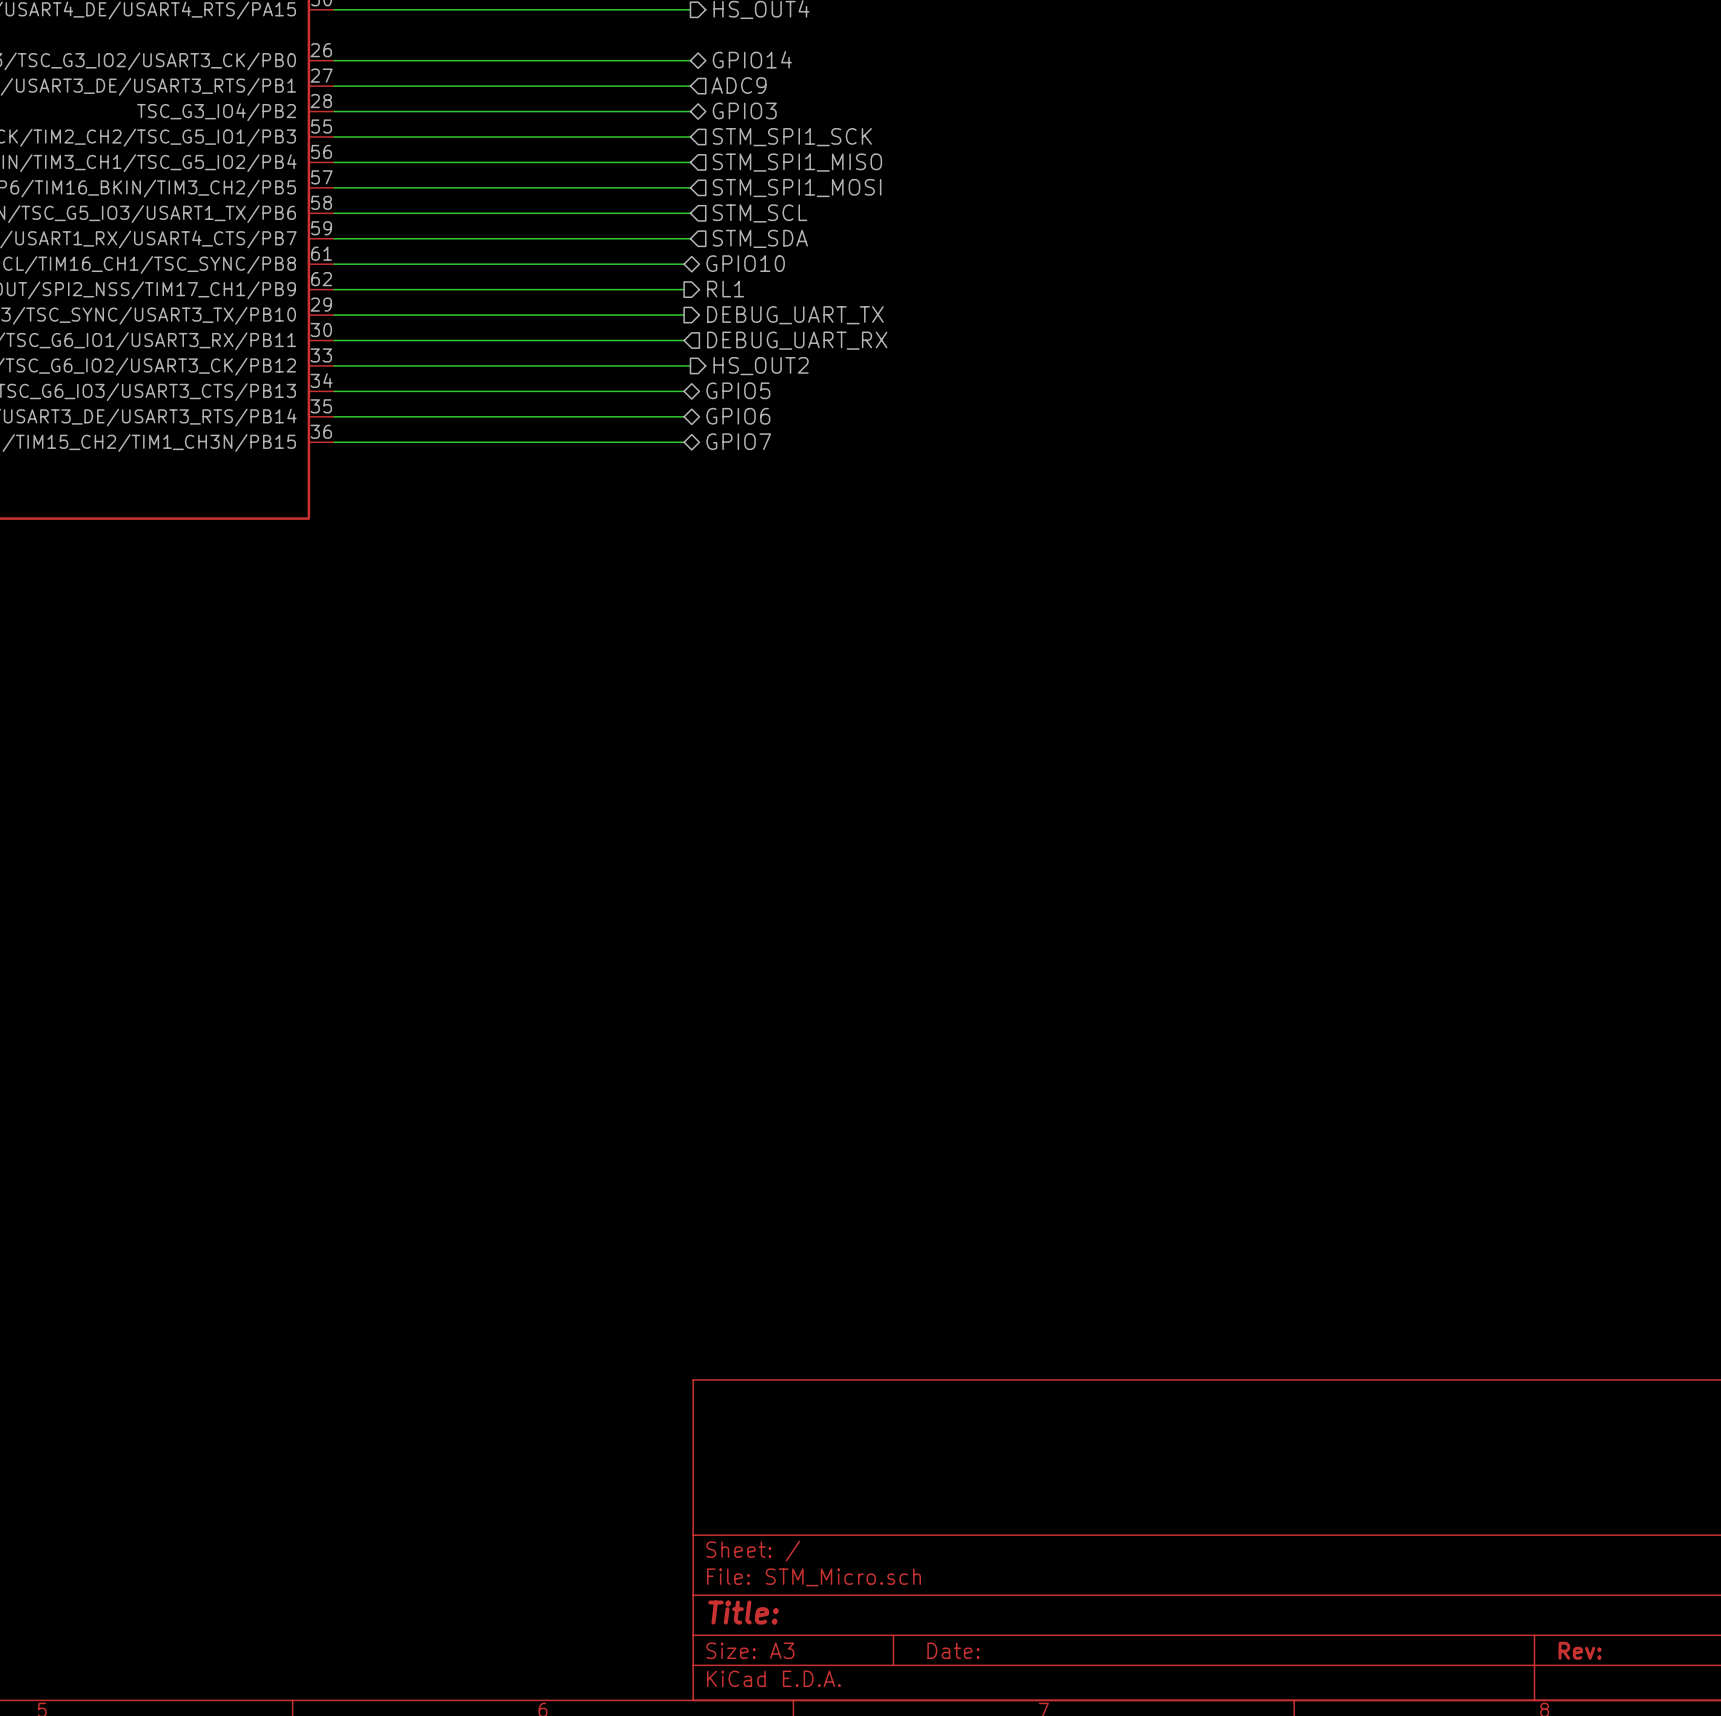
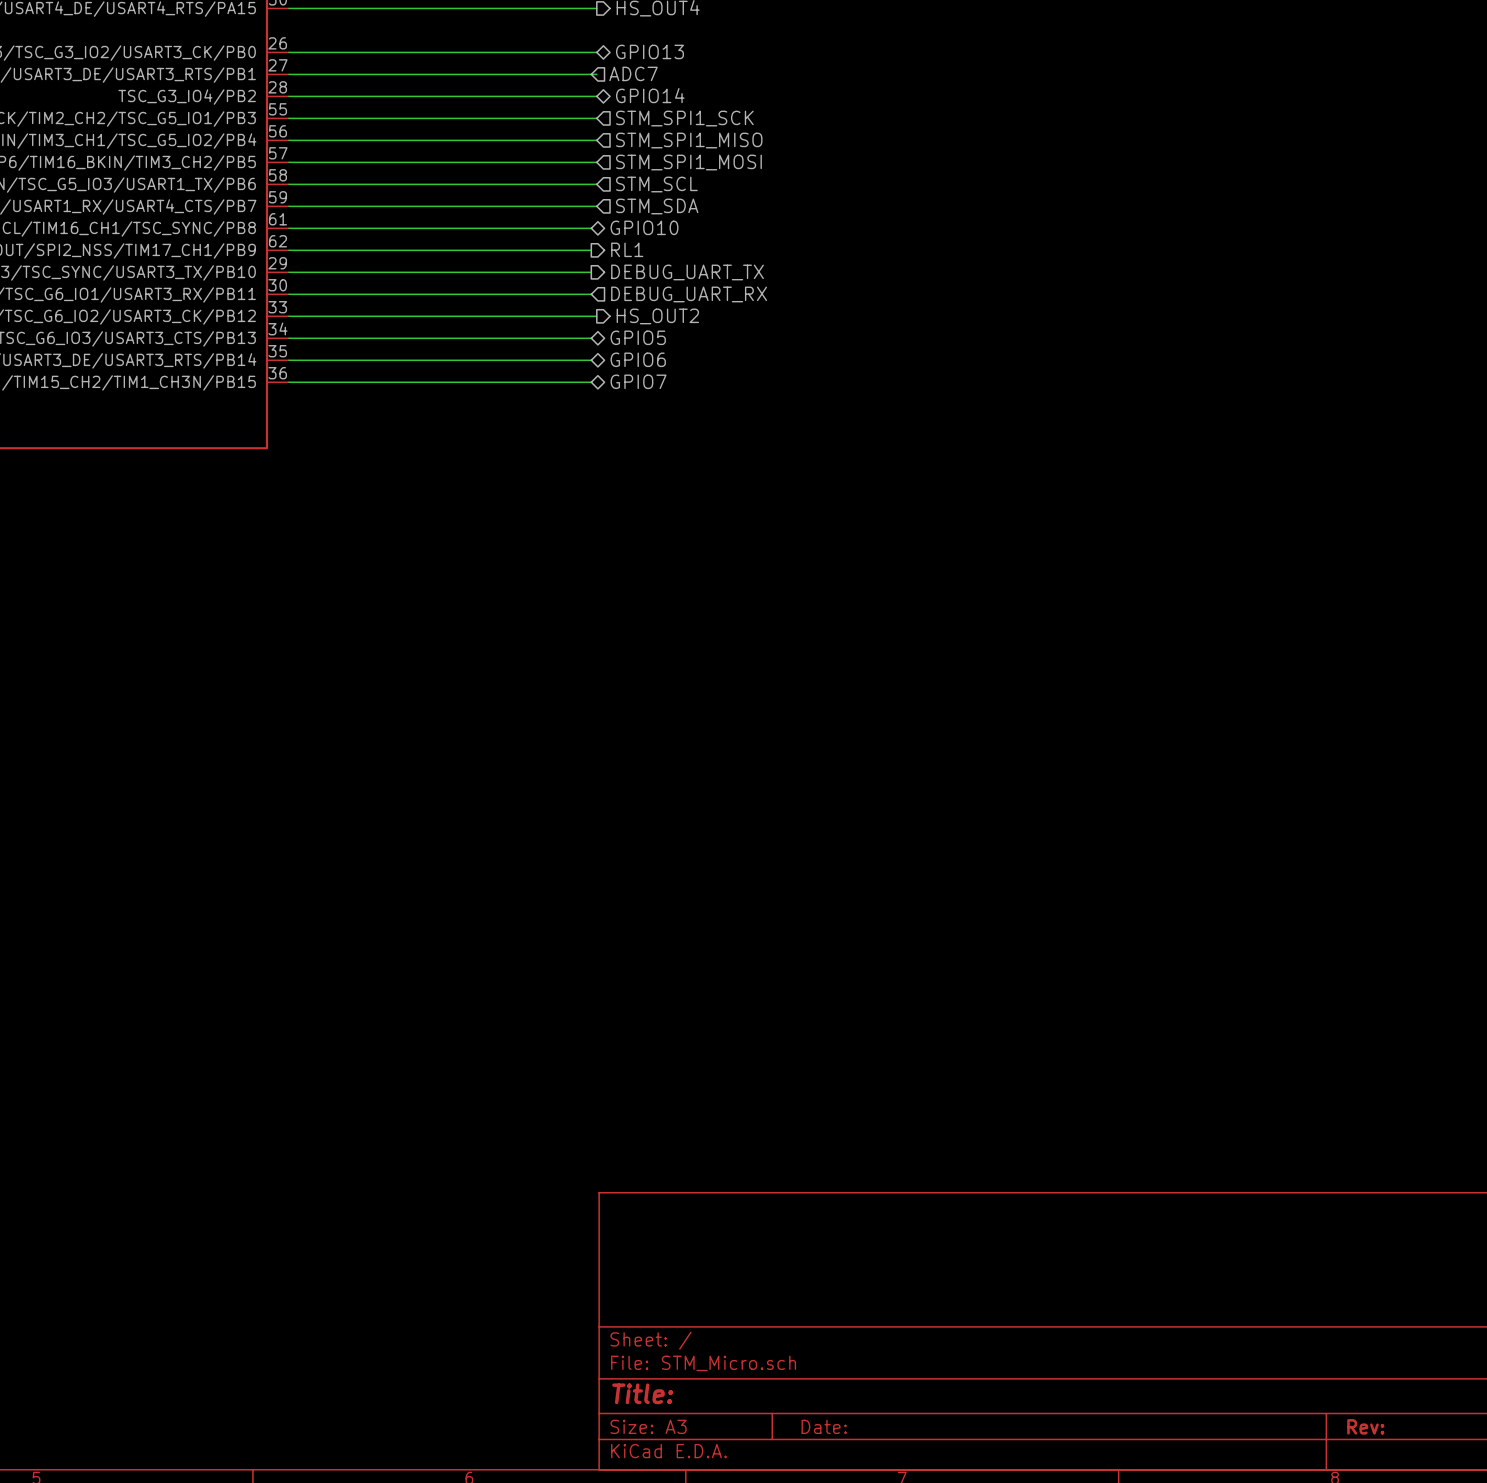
hierarchical label: GPIO14 (752, 59) -> GPIO13 (649, 51)
hierarchical label: ADC9 (738, 85) -> ADC7 (633, 73)
hierarchical label: GPIO3 (744, 110) -> GPIO14 (650, 95)

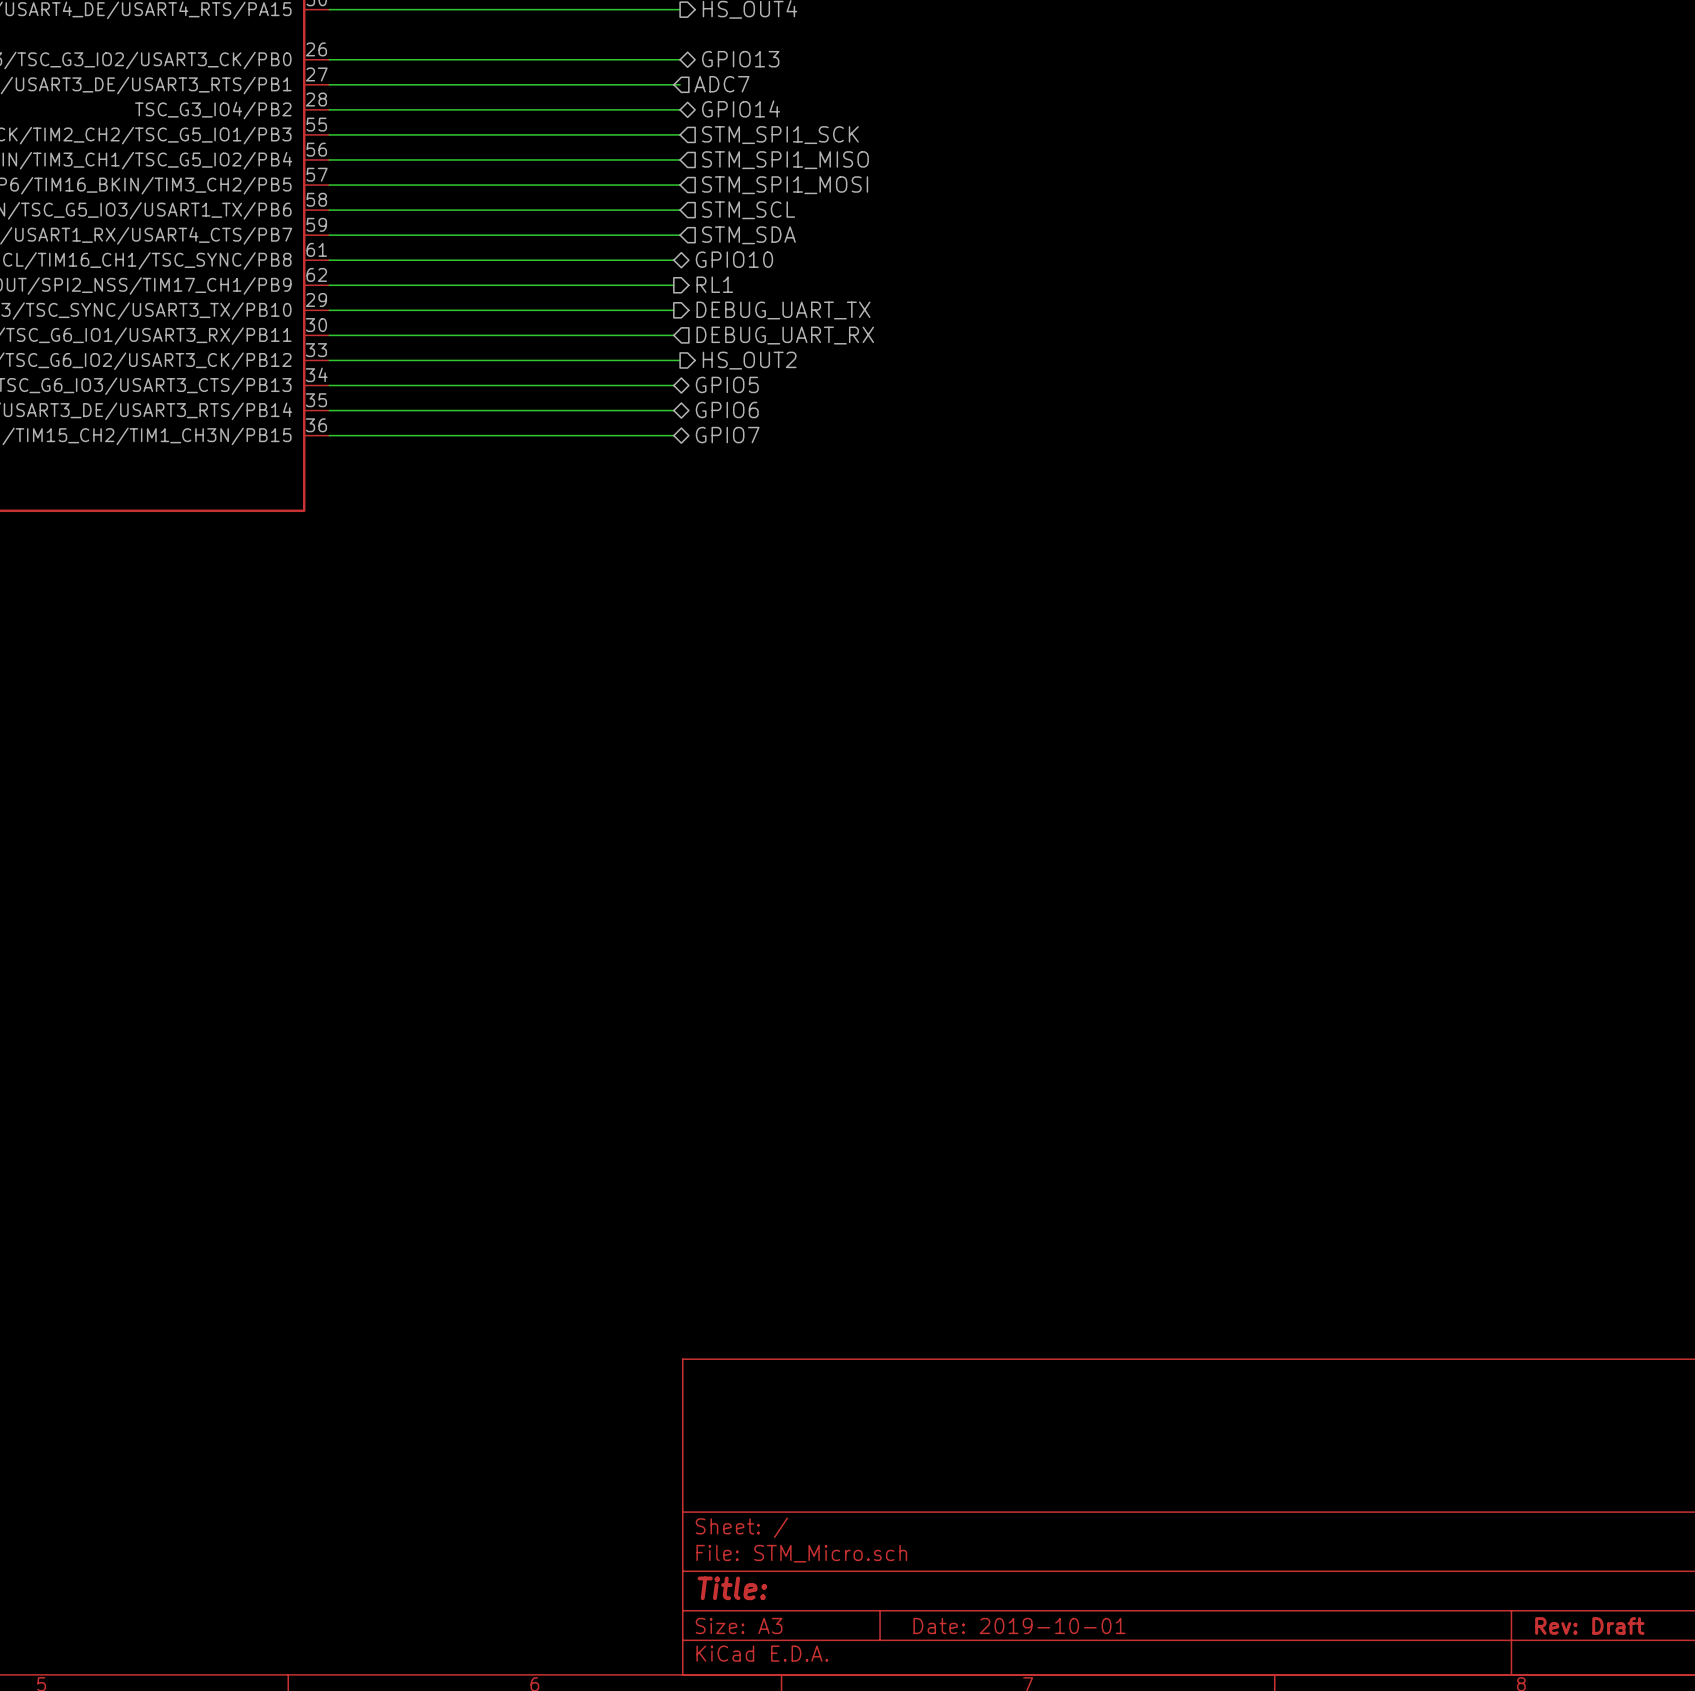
title block: Date: (824, 1426) -> Date: 2019-10-01 (1019, 1625)
title block: Rev: (1365, 1426) -> Rev: Draft (1589, 1625)

